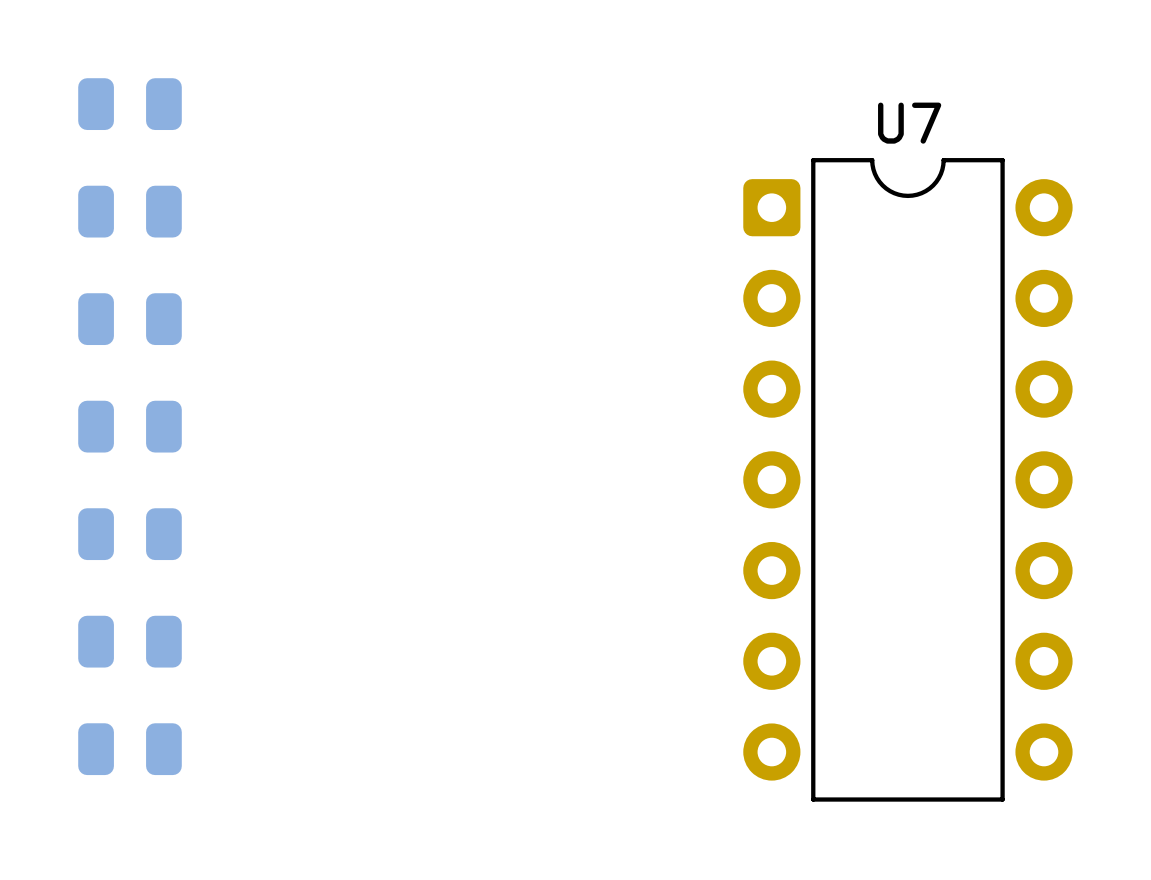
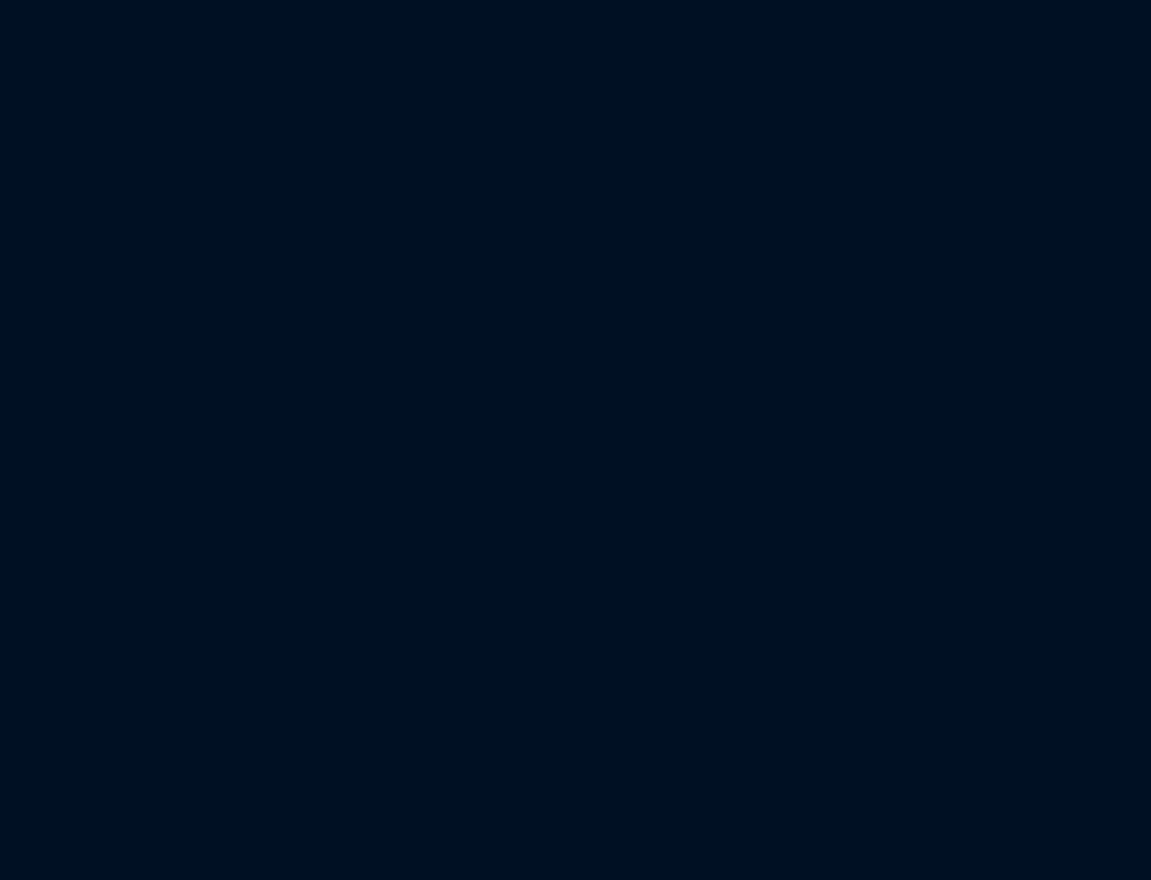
part: (130, 104) -> none
part: (130, 211) -> none
part: (130, 319) -> none
part: (130, 426) -> none
U7: (907, 479) -> none
part: (130, 534) -> none
part: (130, 641) -> none
part: (130, 749) -> none

